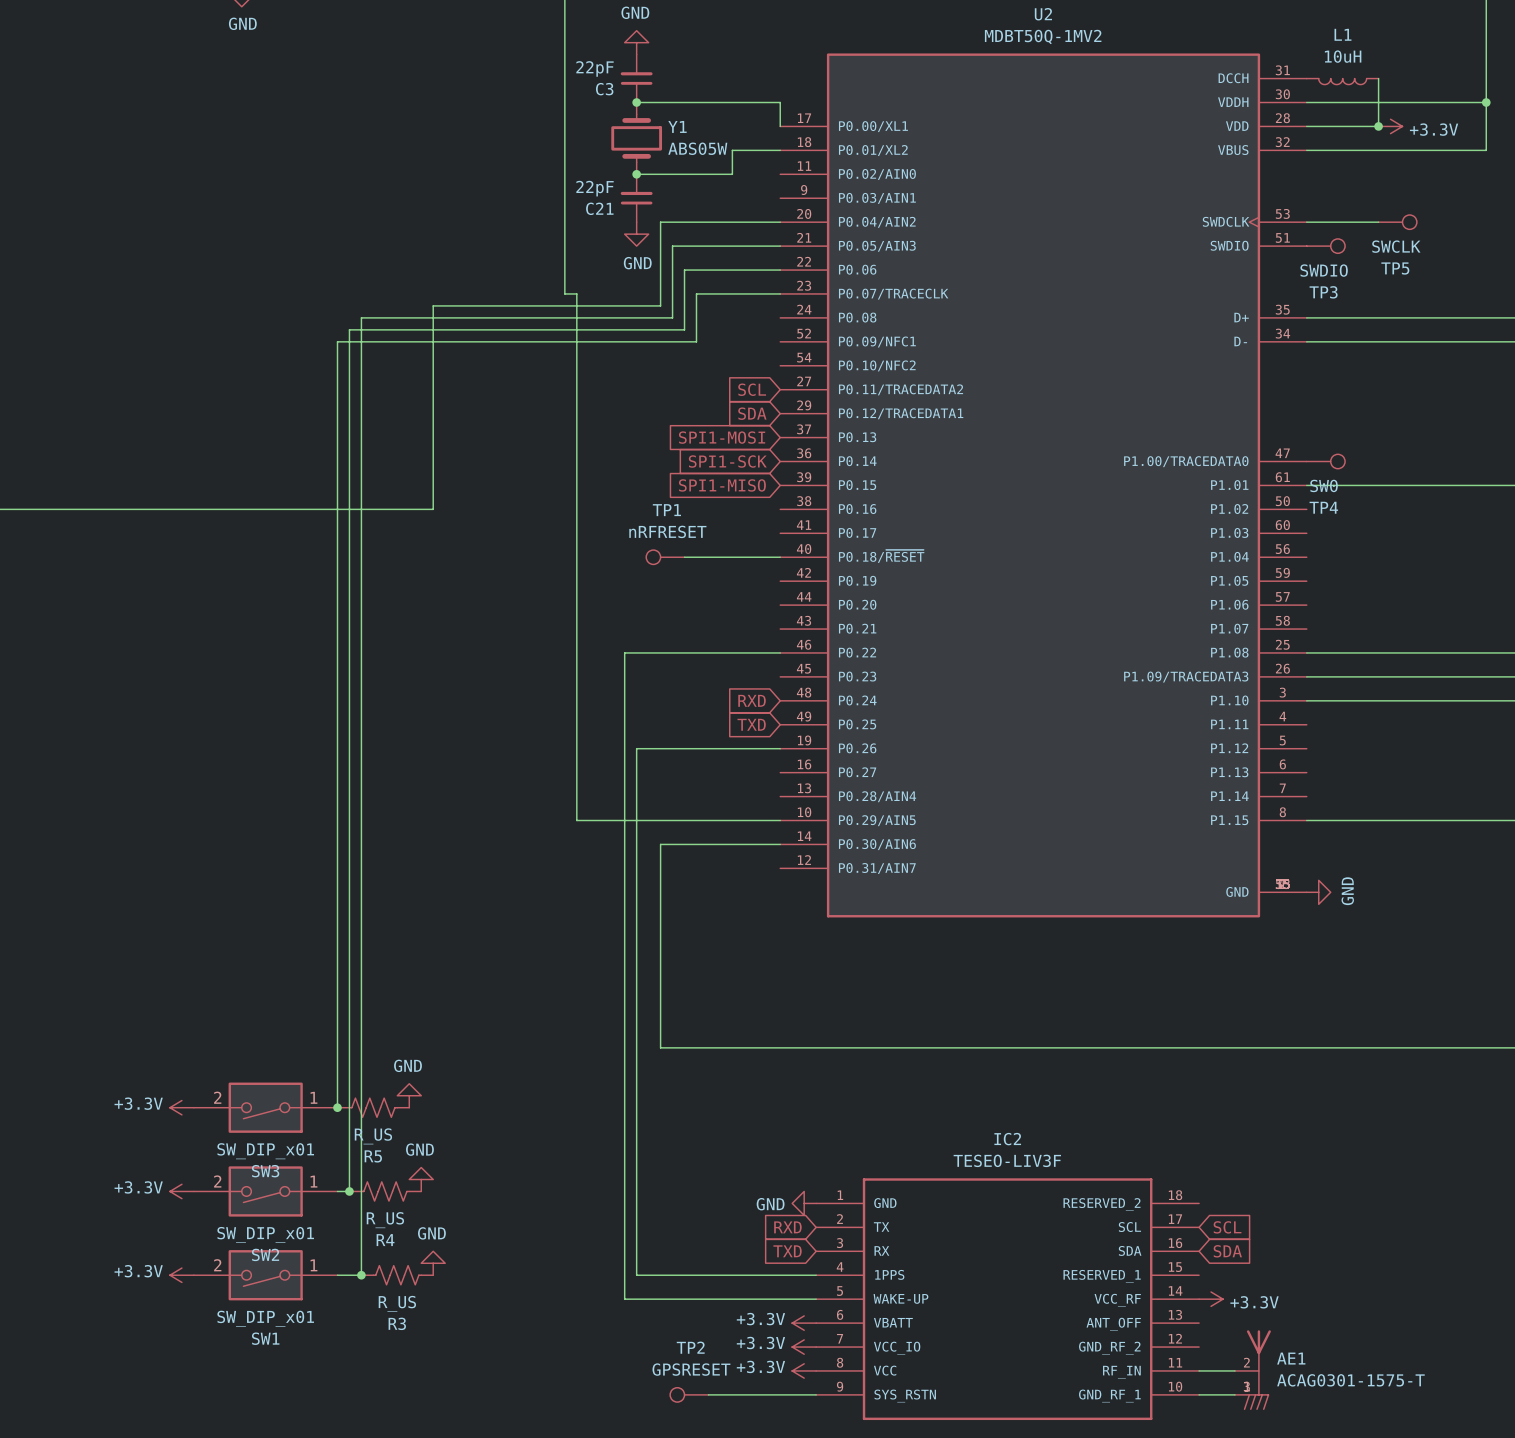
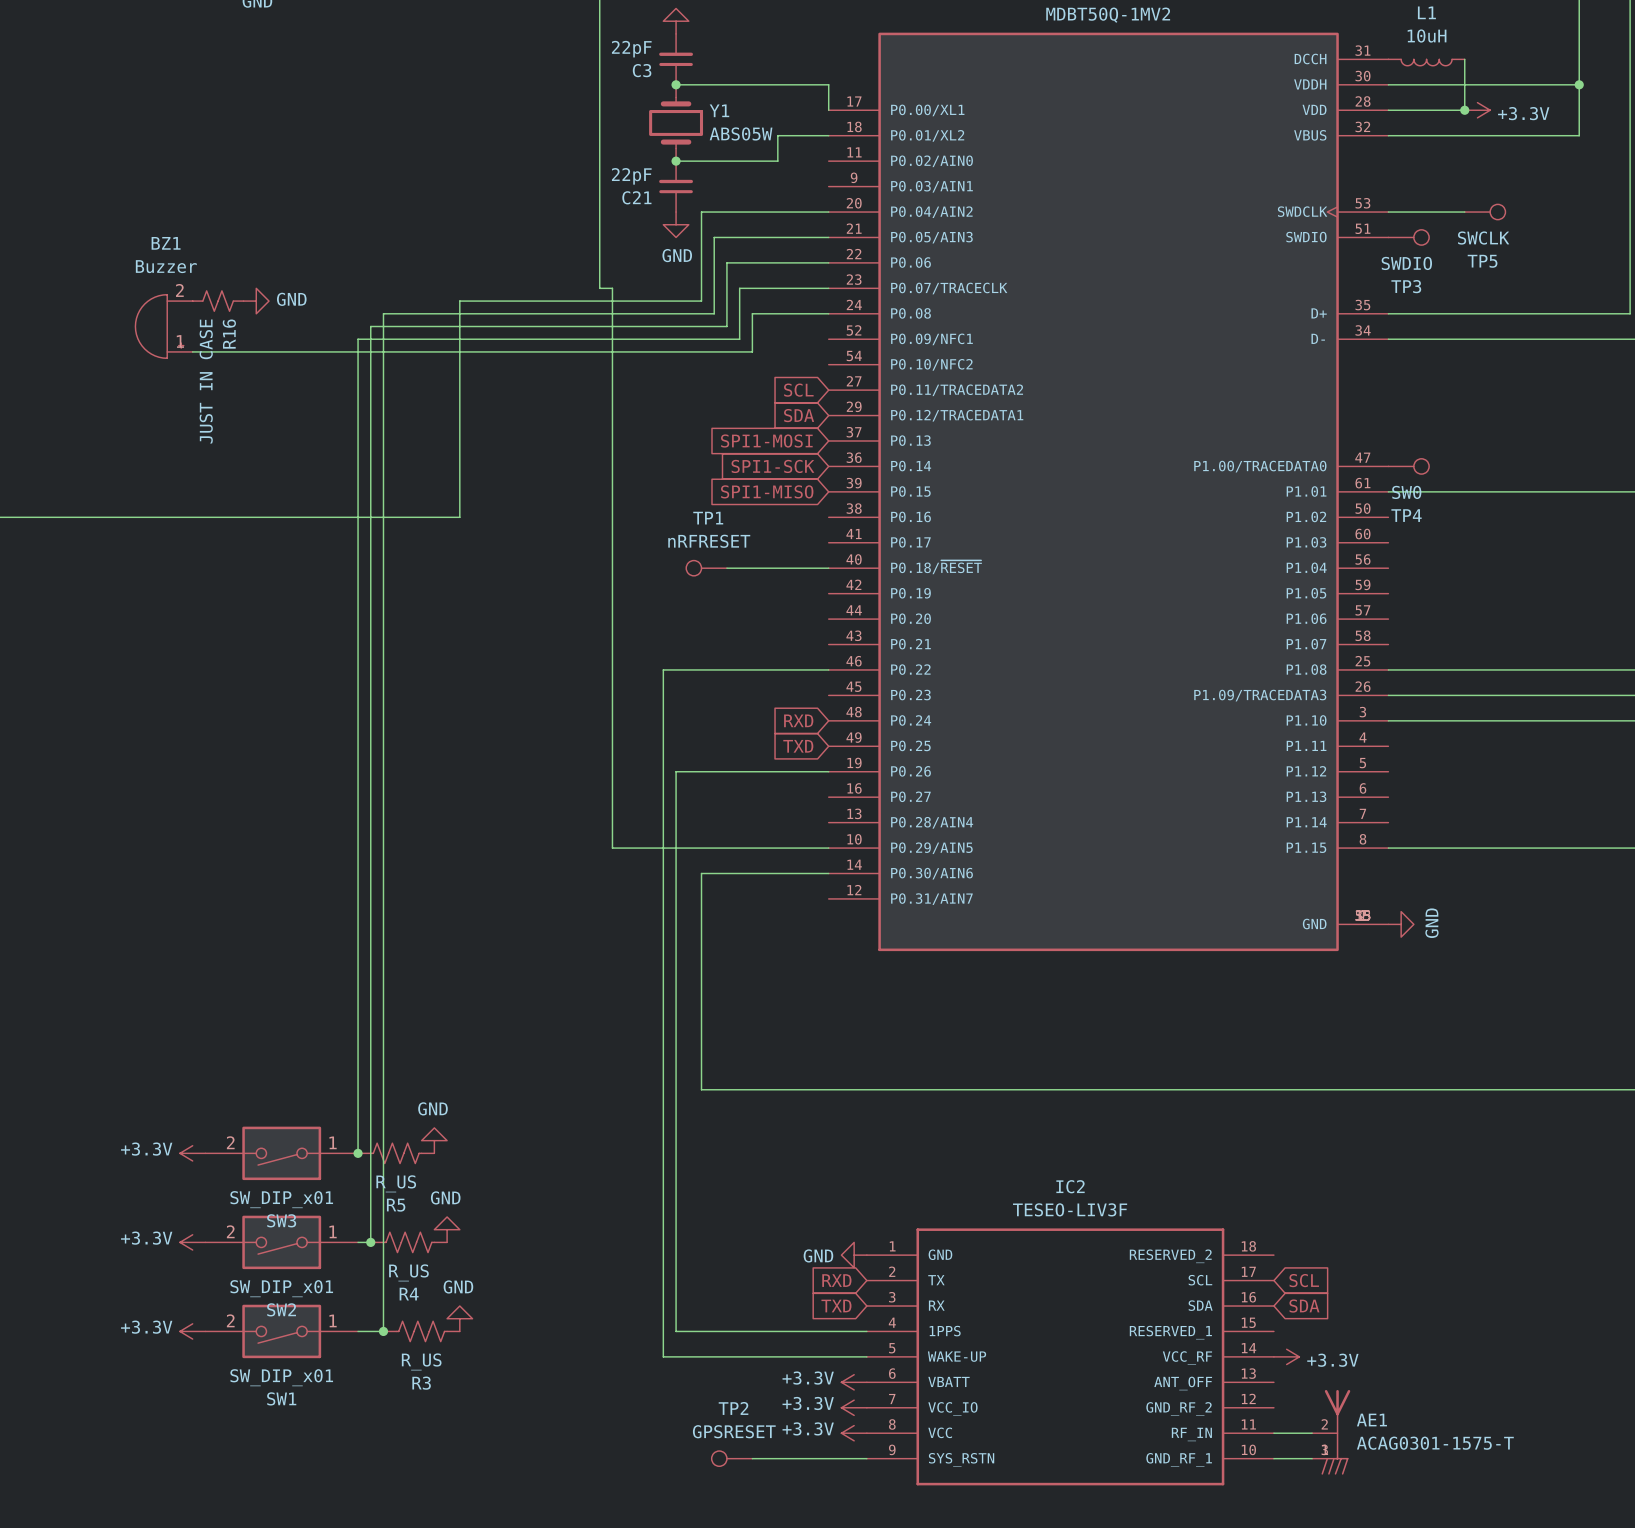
R16: none -> JUST IN CASE (218, 301)
power symbol: none -> GND (256, 301)
wire: none -> (828, 313) (752, 313) (752, 351) (192, 351)
BZ1: none -> Buzzer (164, 326)

